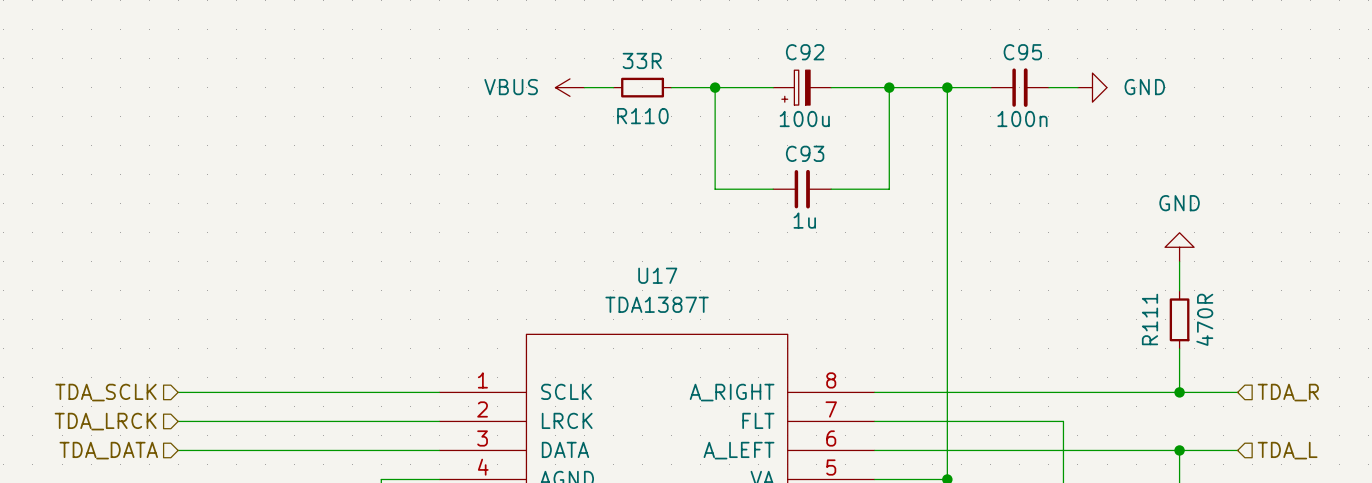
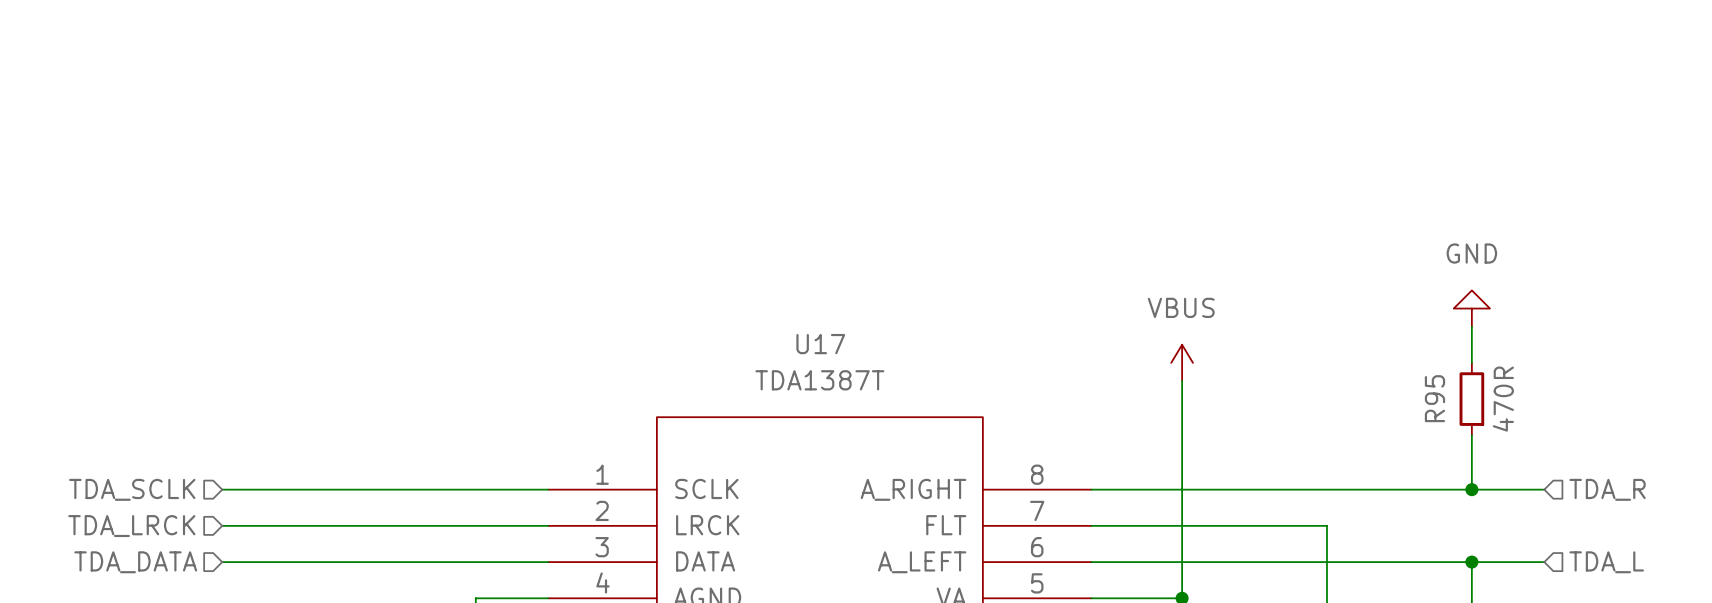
power symbol: VBUS (569, 87) -> none
wire: (584, 87) (613, 87) -> none
R110: 33R (642, 87) -> none
wire: (671, 87) (773, 87) -> none
wire: (715, 87) (715, 189) (773, 189) -> none
junction: (715, 87) -> none
C92: 100u (802, 87) -> none
wire: (831, 87) (990, 87) -> none
wire: (889, 87) (889, 189) (831, 189) -> none
junction: (889, 87) -> none
wire: (947, 87) (947, 305) -> none
junction: (947, 87) -> none
C95: 100n (1019, 87) -> none
wire: (1048, 87) (1077, 87) -> none
power symbol: GND (1092, 87) -> none
C93: 1u (802, 189) -> none
power symbol: none -> VBUS (1182, 362)
R111 name: R111 (1150, 319) -> R95 (1434, 398)

